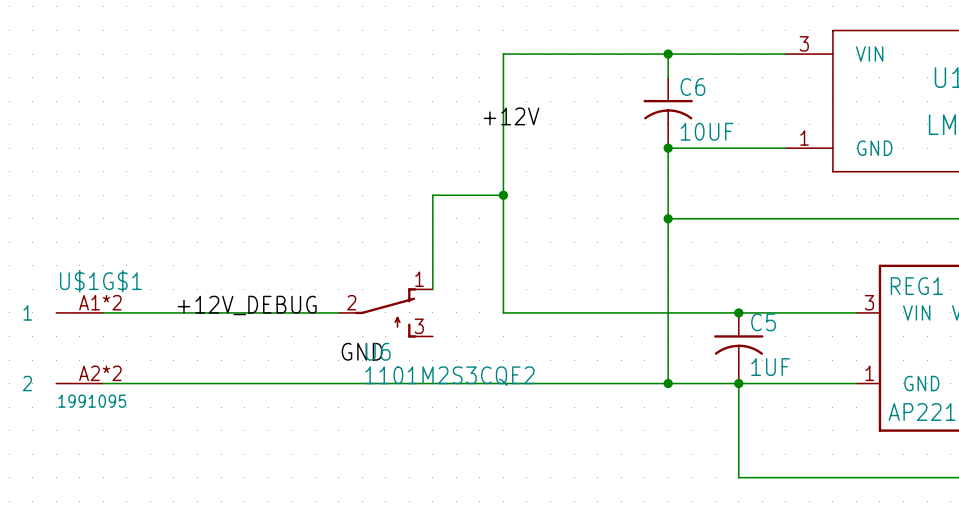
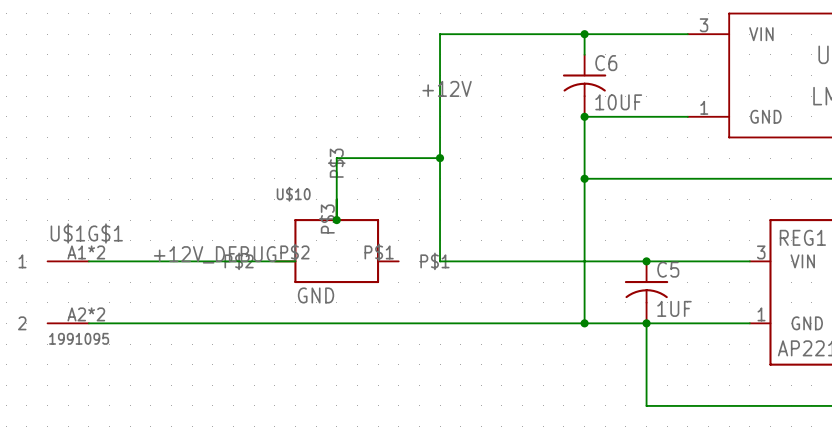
wire: (432, 195) (432, 289) -> (378, 158) (336, 158) (336, 220)
junction: none -> (336, 220)
U$10: none -> (336, 241)
U6: 1101M2S3CQE2 (385, 312) -> none

